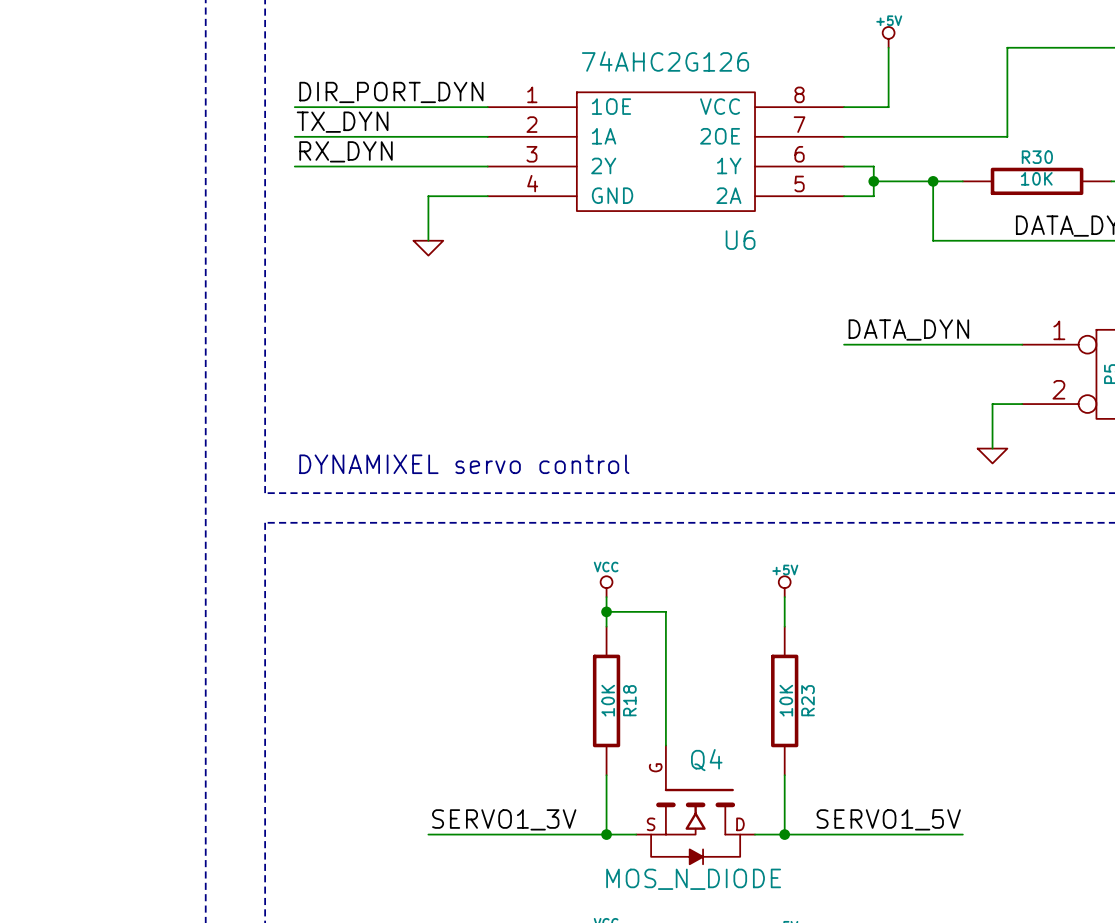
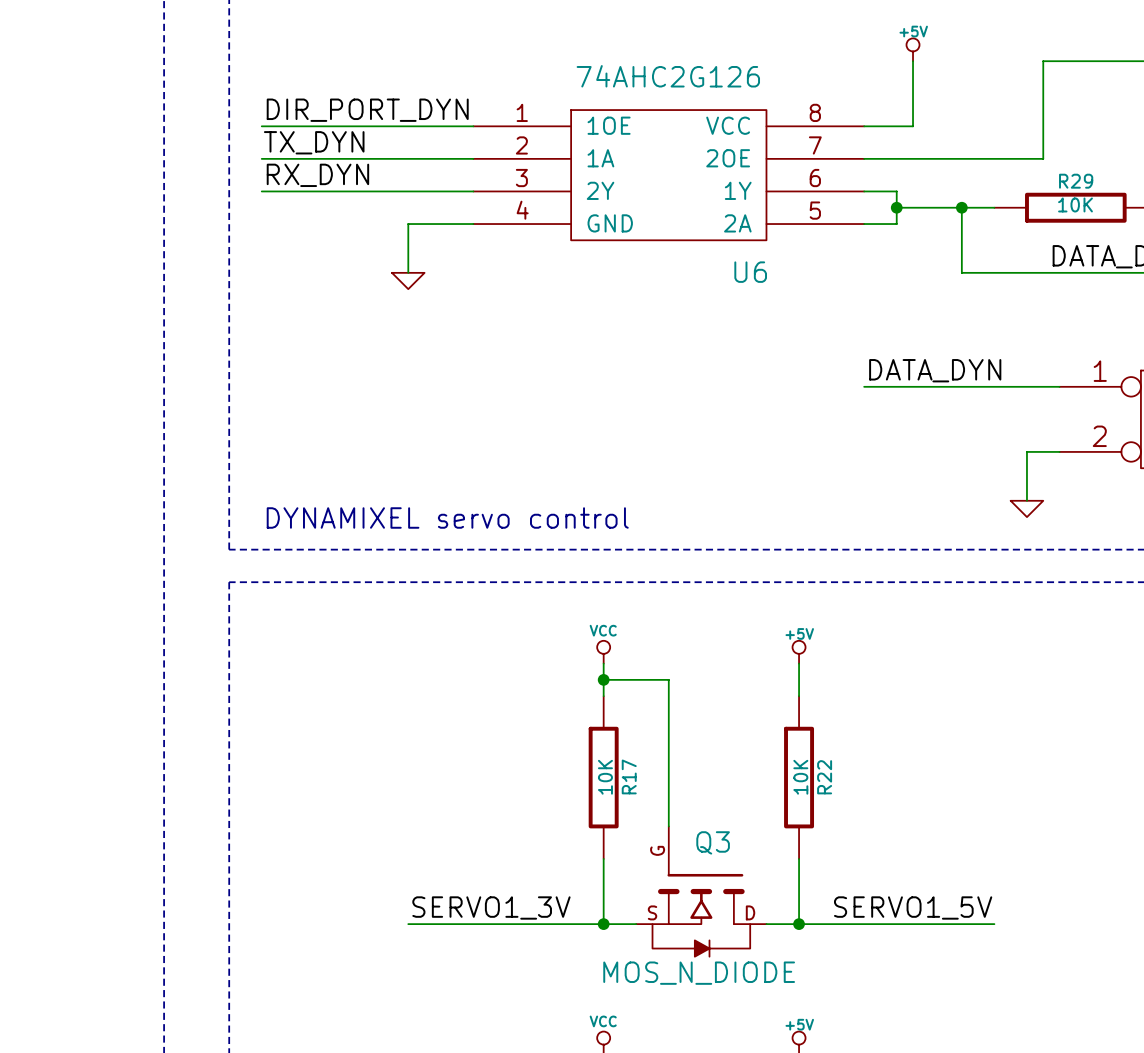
R30 name: R30 (1037, 157) -> R29 (1076, 181)
R18 name: R18 (629, 700) -> R17 (629, 776)
R23 name: R23 (808, 700) -> R22 (824, 777)
Q4 name: Q4 (706, 760) -> Q3 (713, 842)

